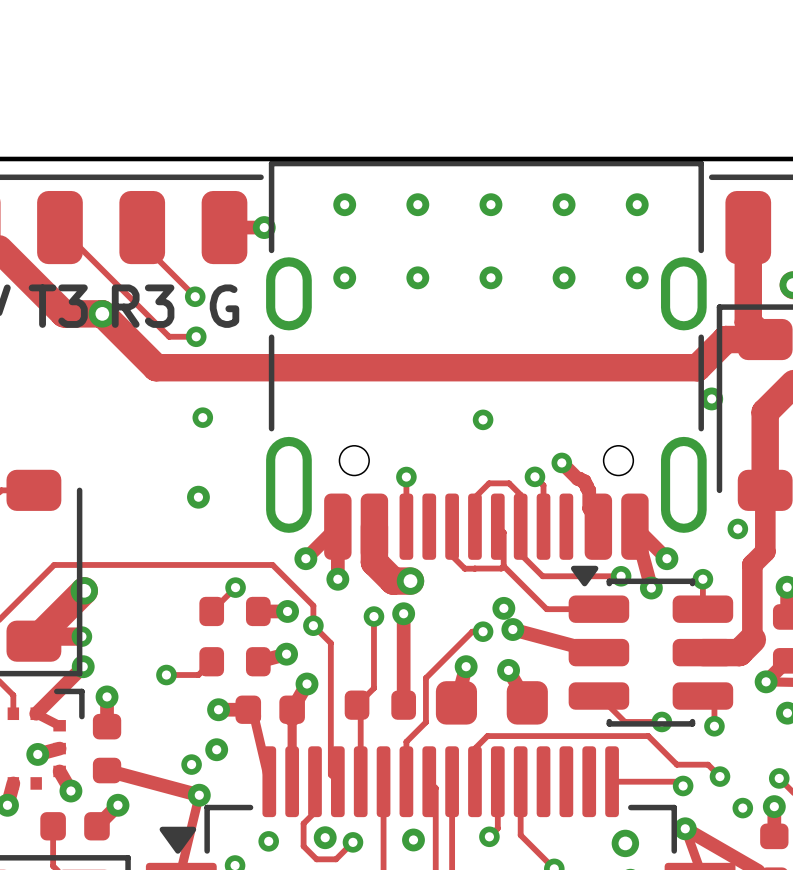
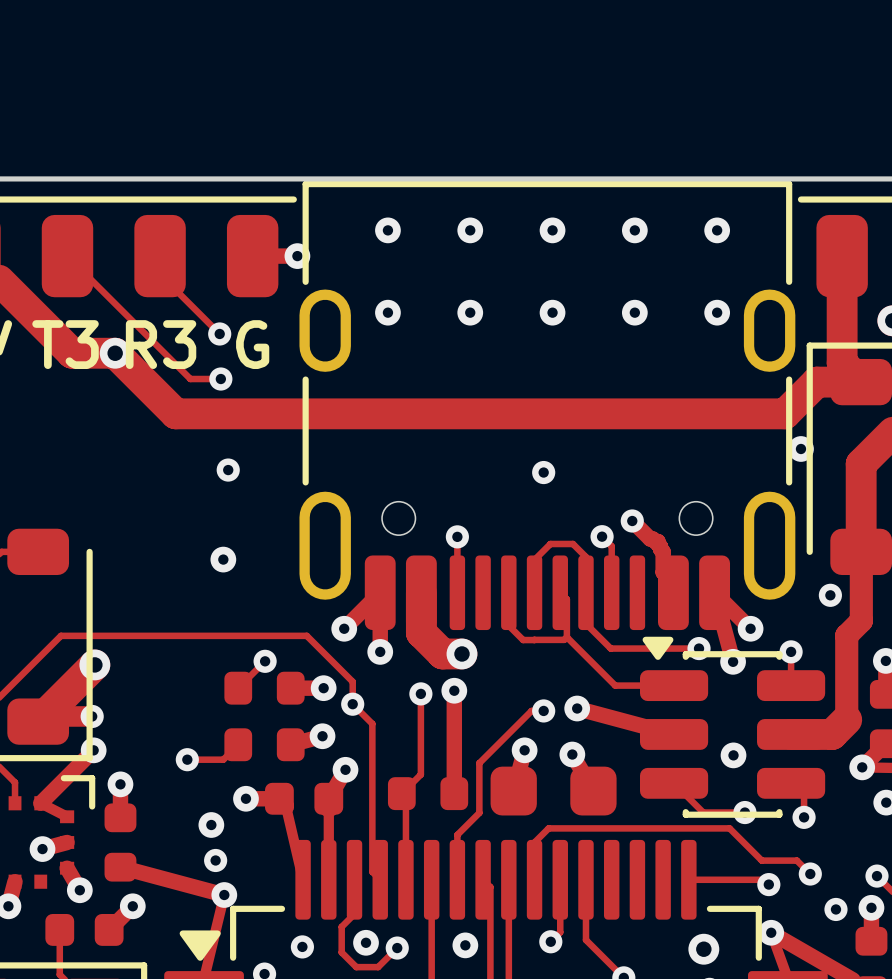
via position: (503, 608) -> (733, 755)
via position: (216, 749) -> (211, 825)

